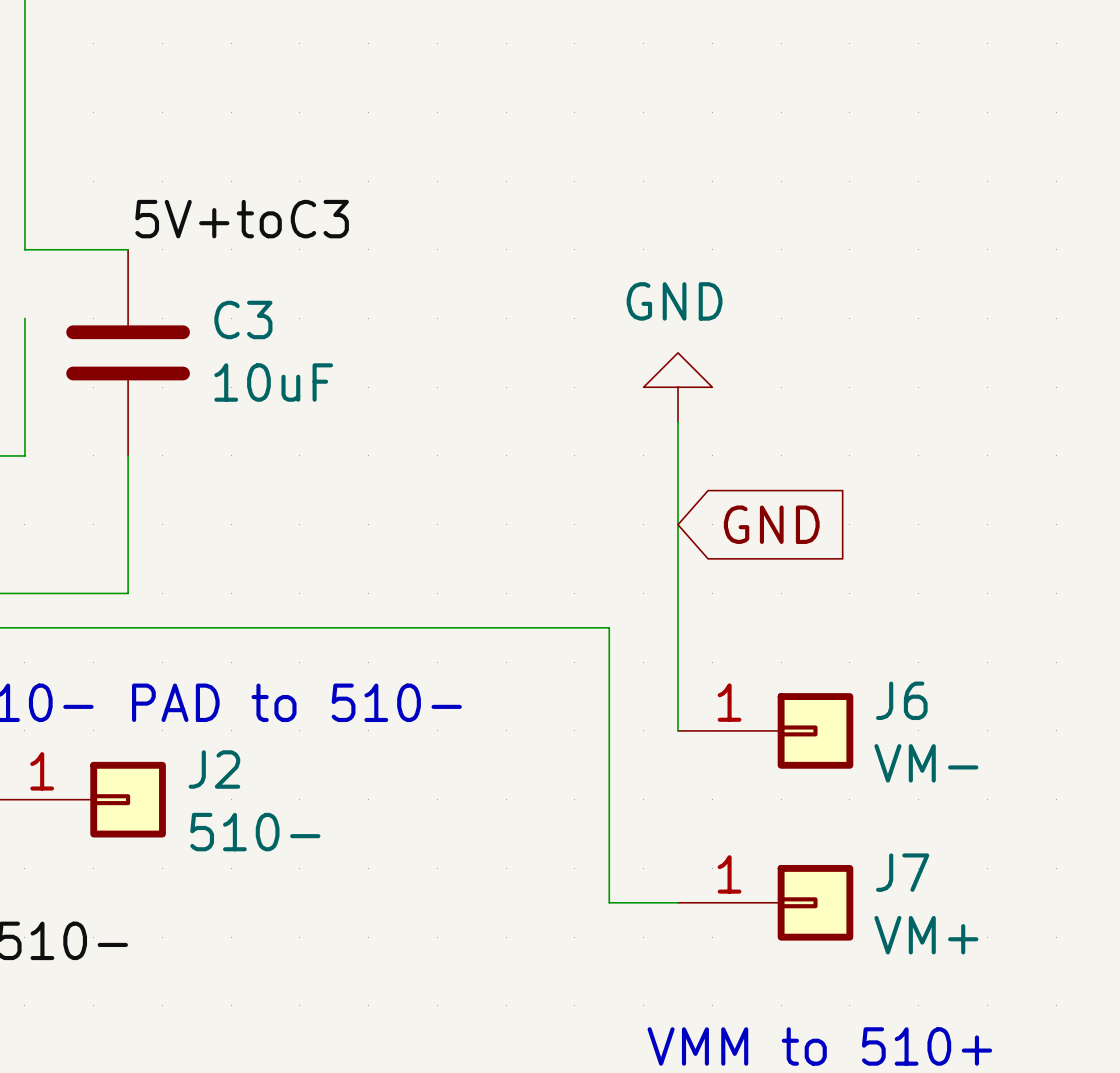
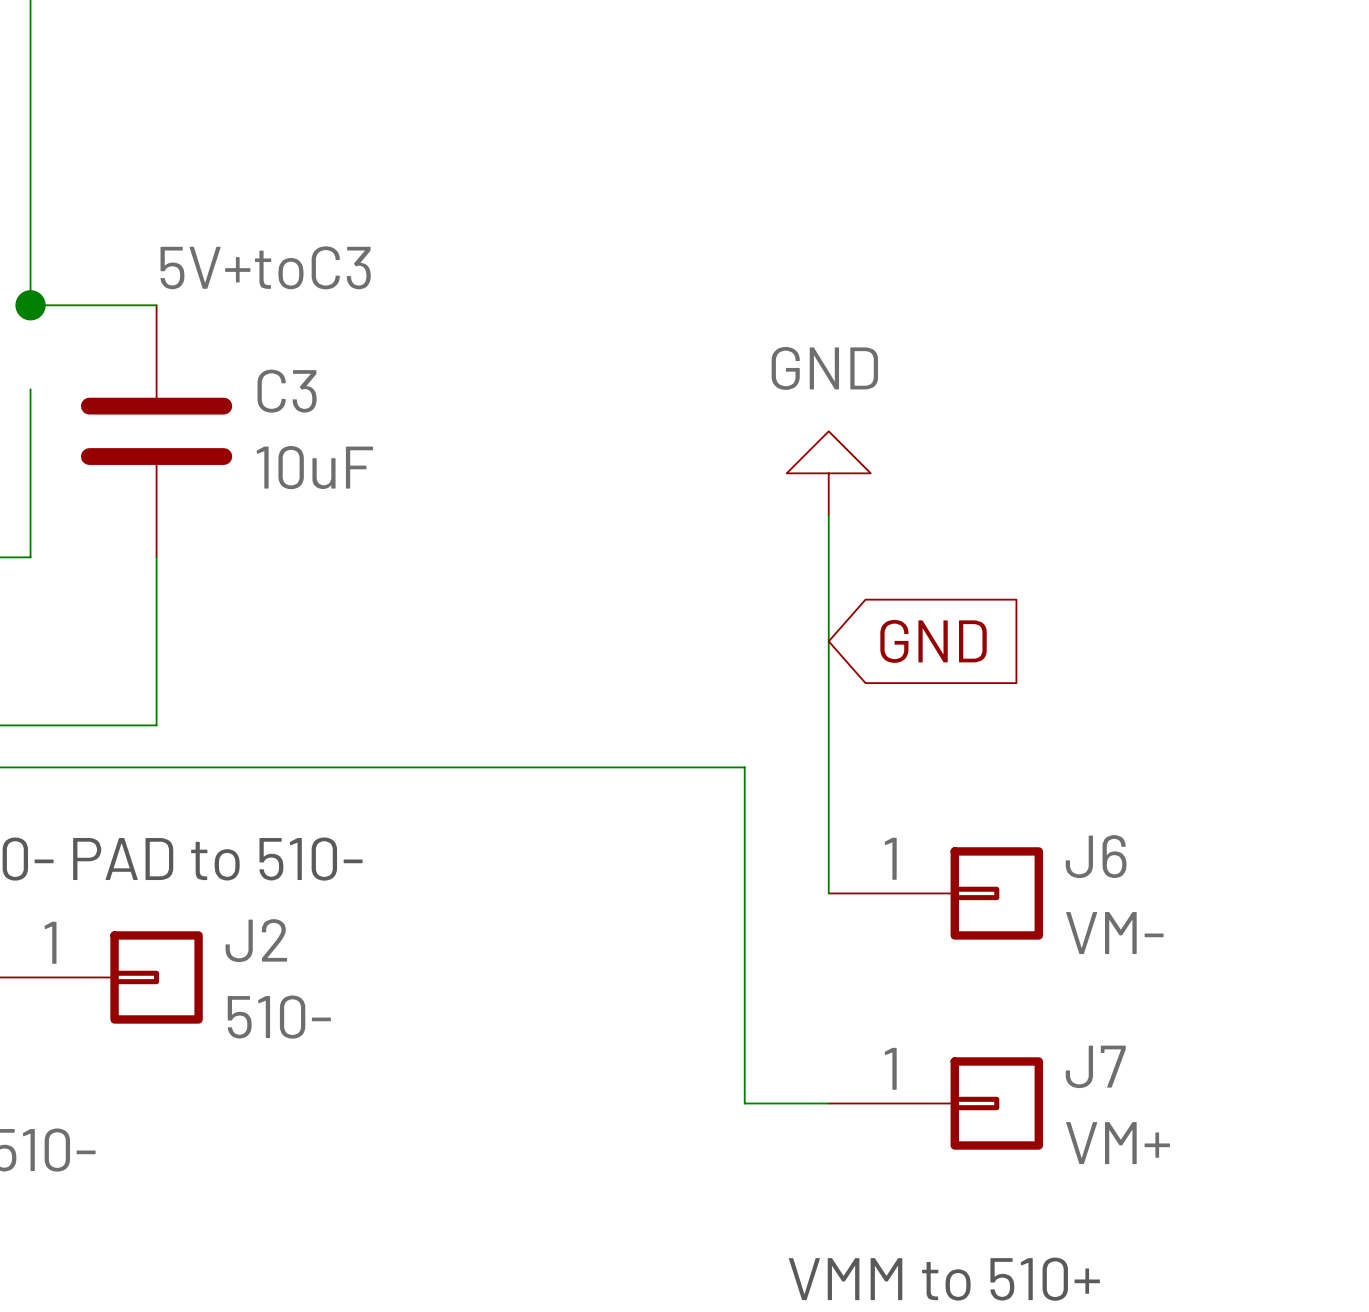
junction: none -> (30, 305)

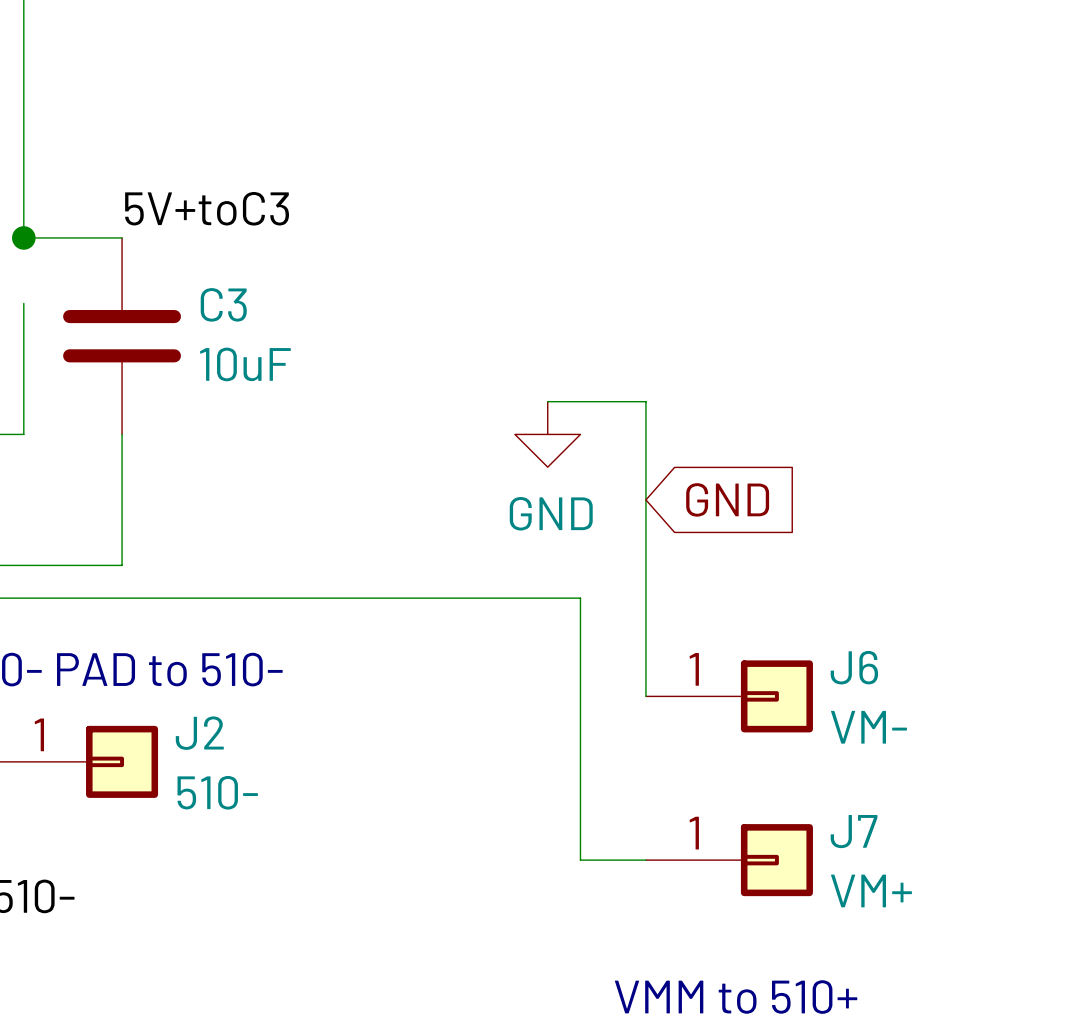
power symbol rotation: 0° (828, 473) -> 180° (547, 434)
power symbol position: GND (828, 473) -> GND (547, 434)
wire: none -> (547, 401) (645, 401)

